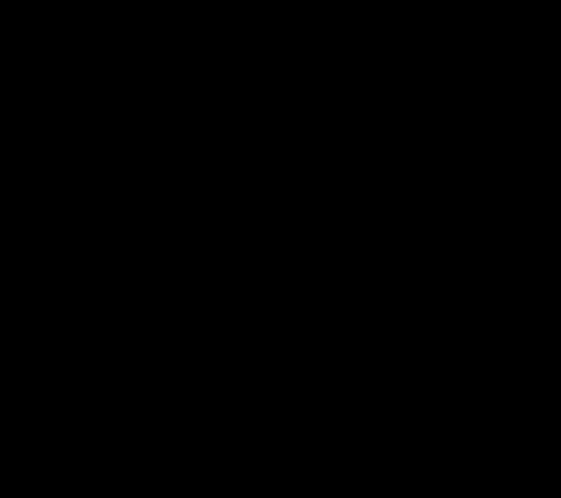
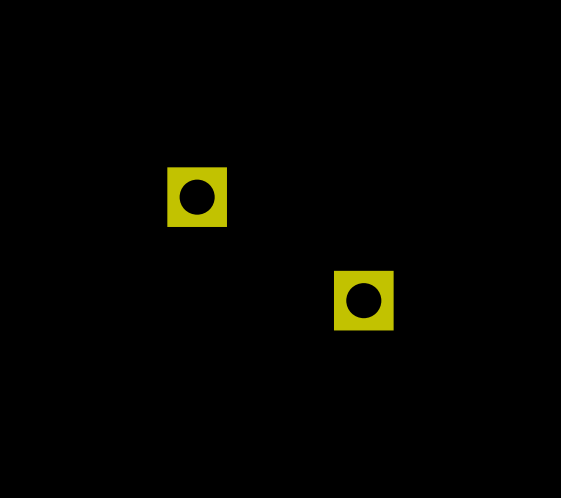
part: none -> (197, 197)
part: none -> (363, 300)

